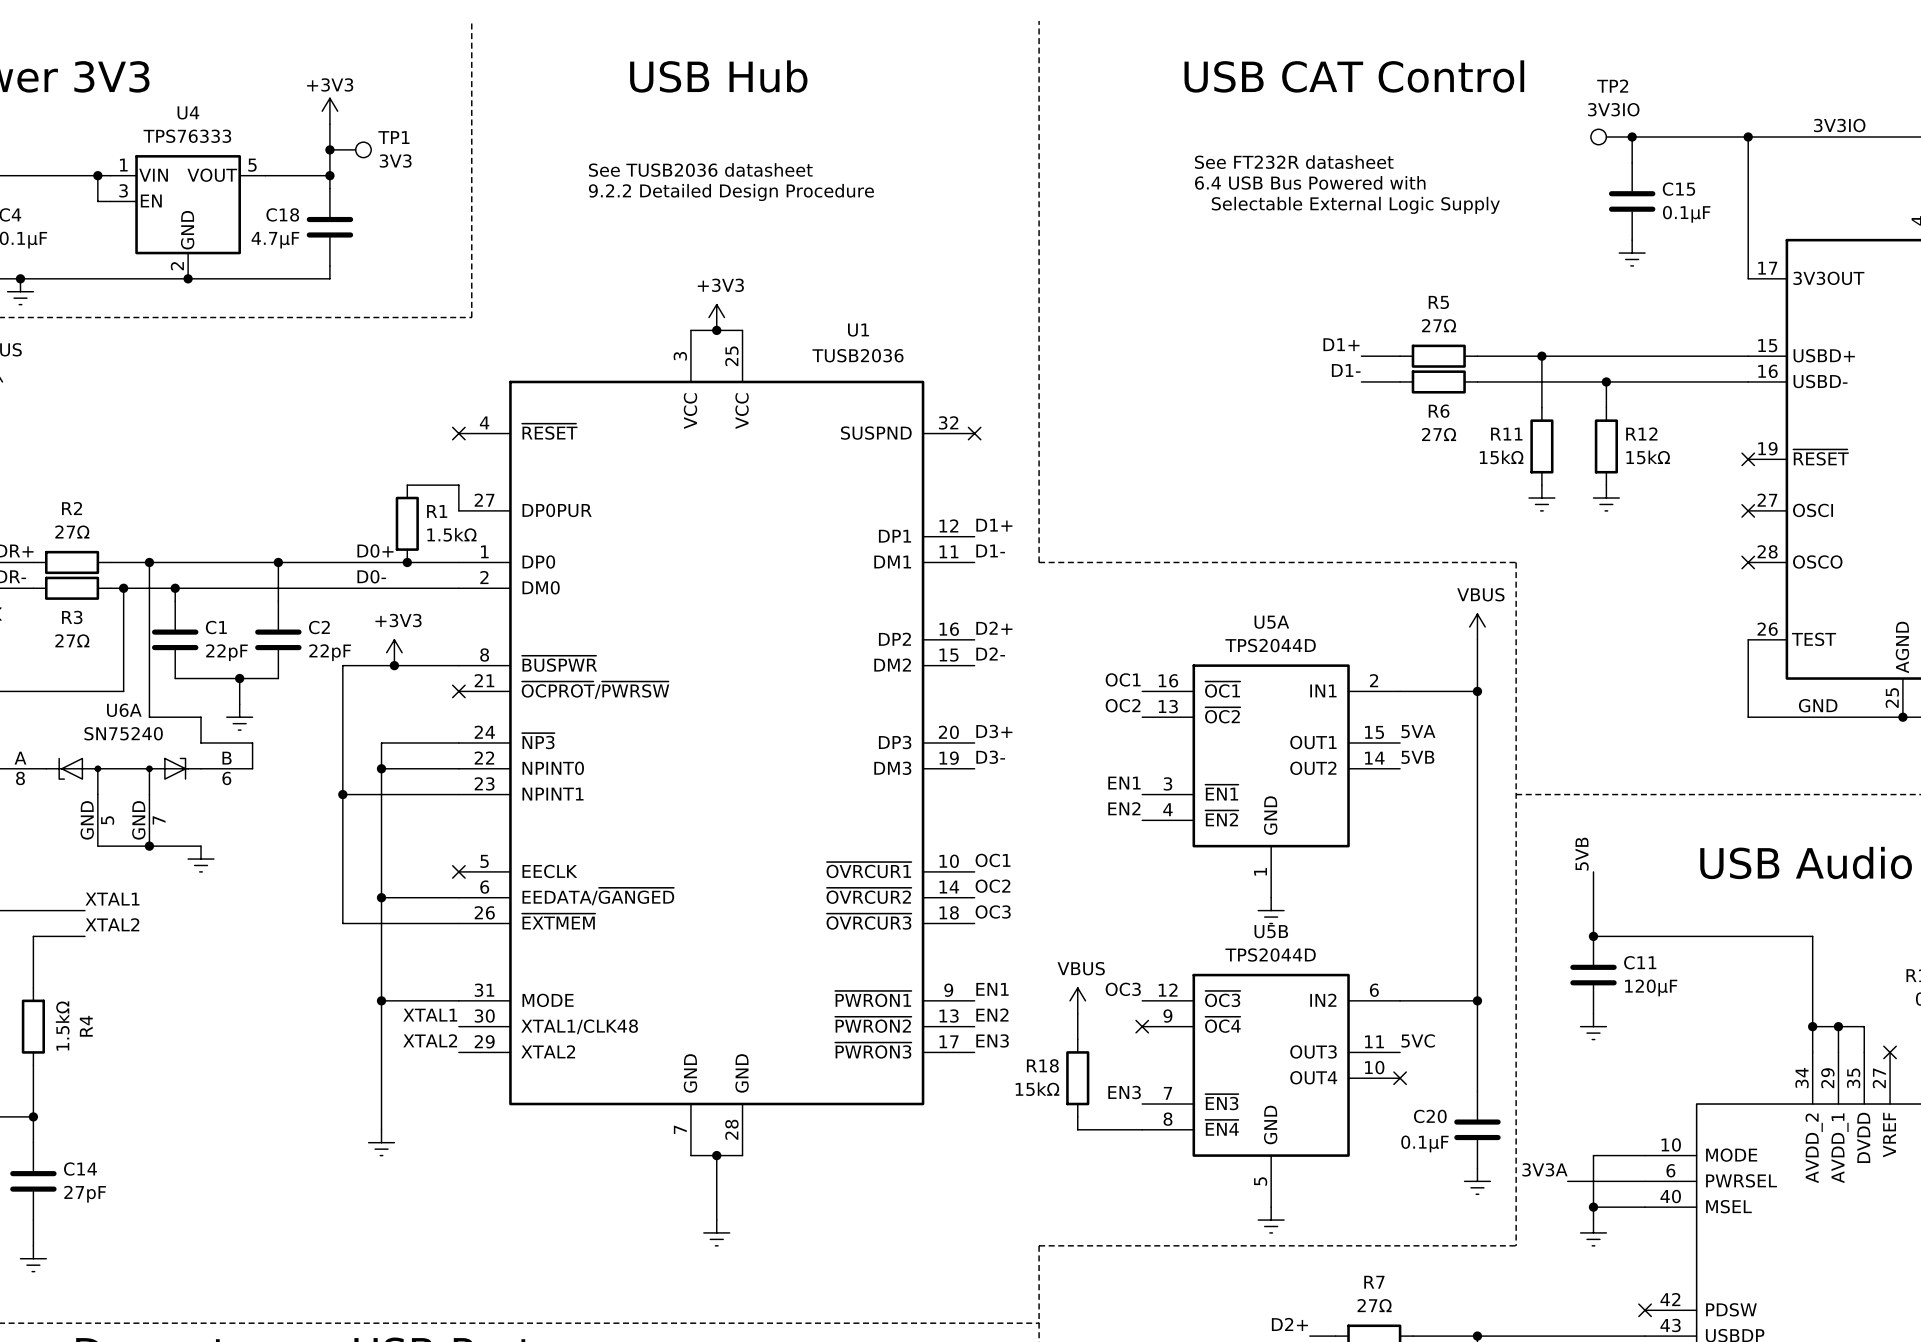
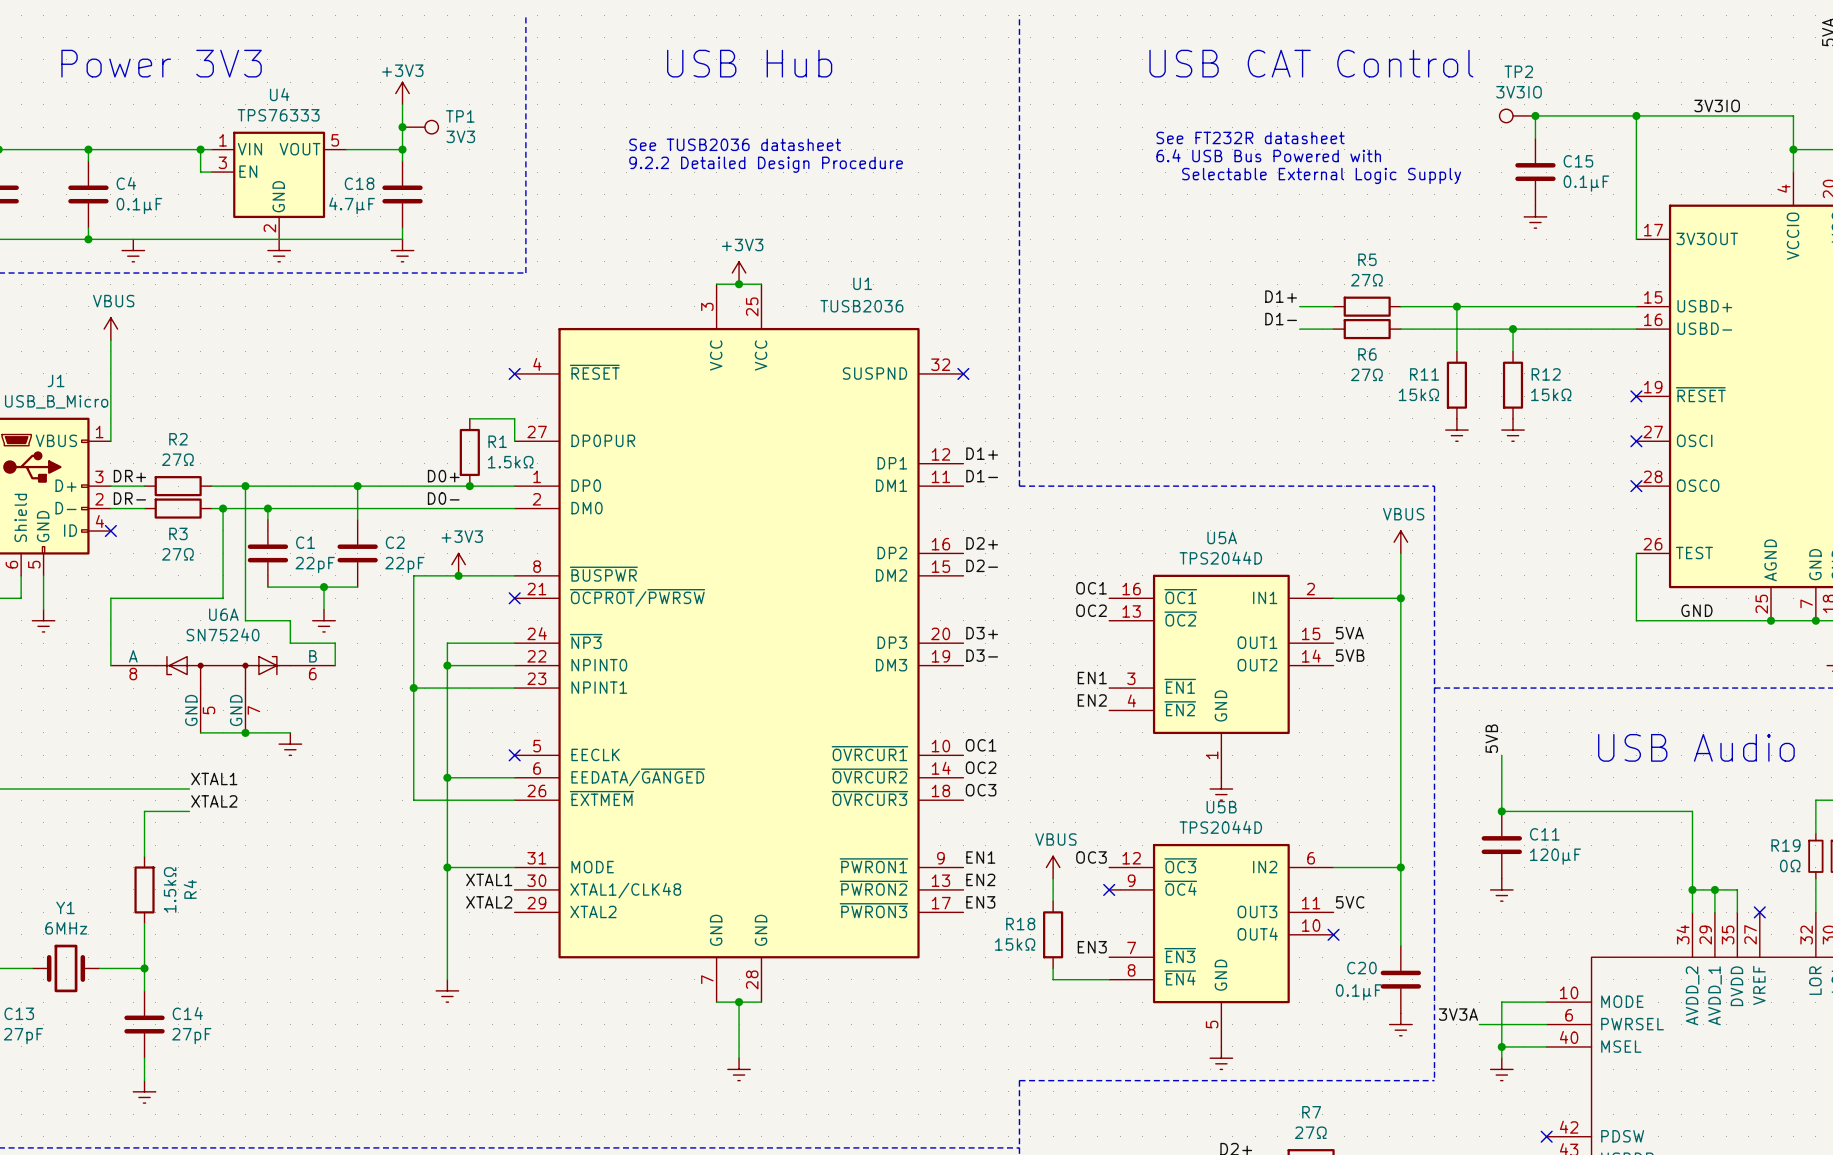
junction: (20, 278) -> none
junction: (188, 278) -> none
power symbol: none -> (279, 250)
power symbol: none -> (402, 250)

